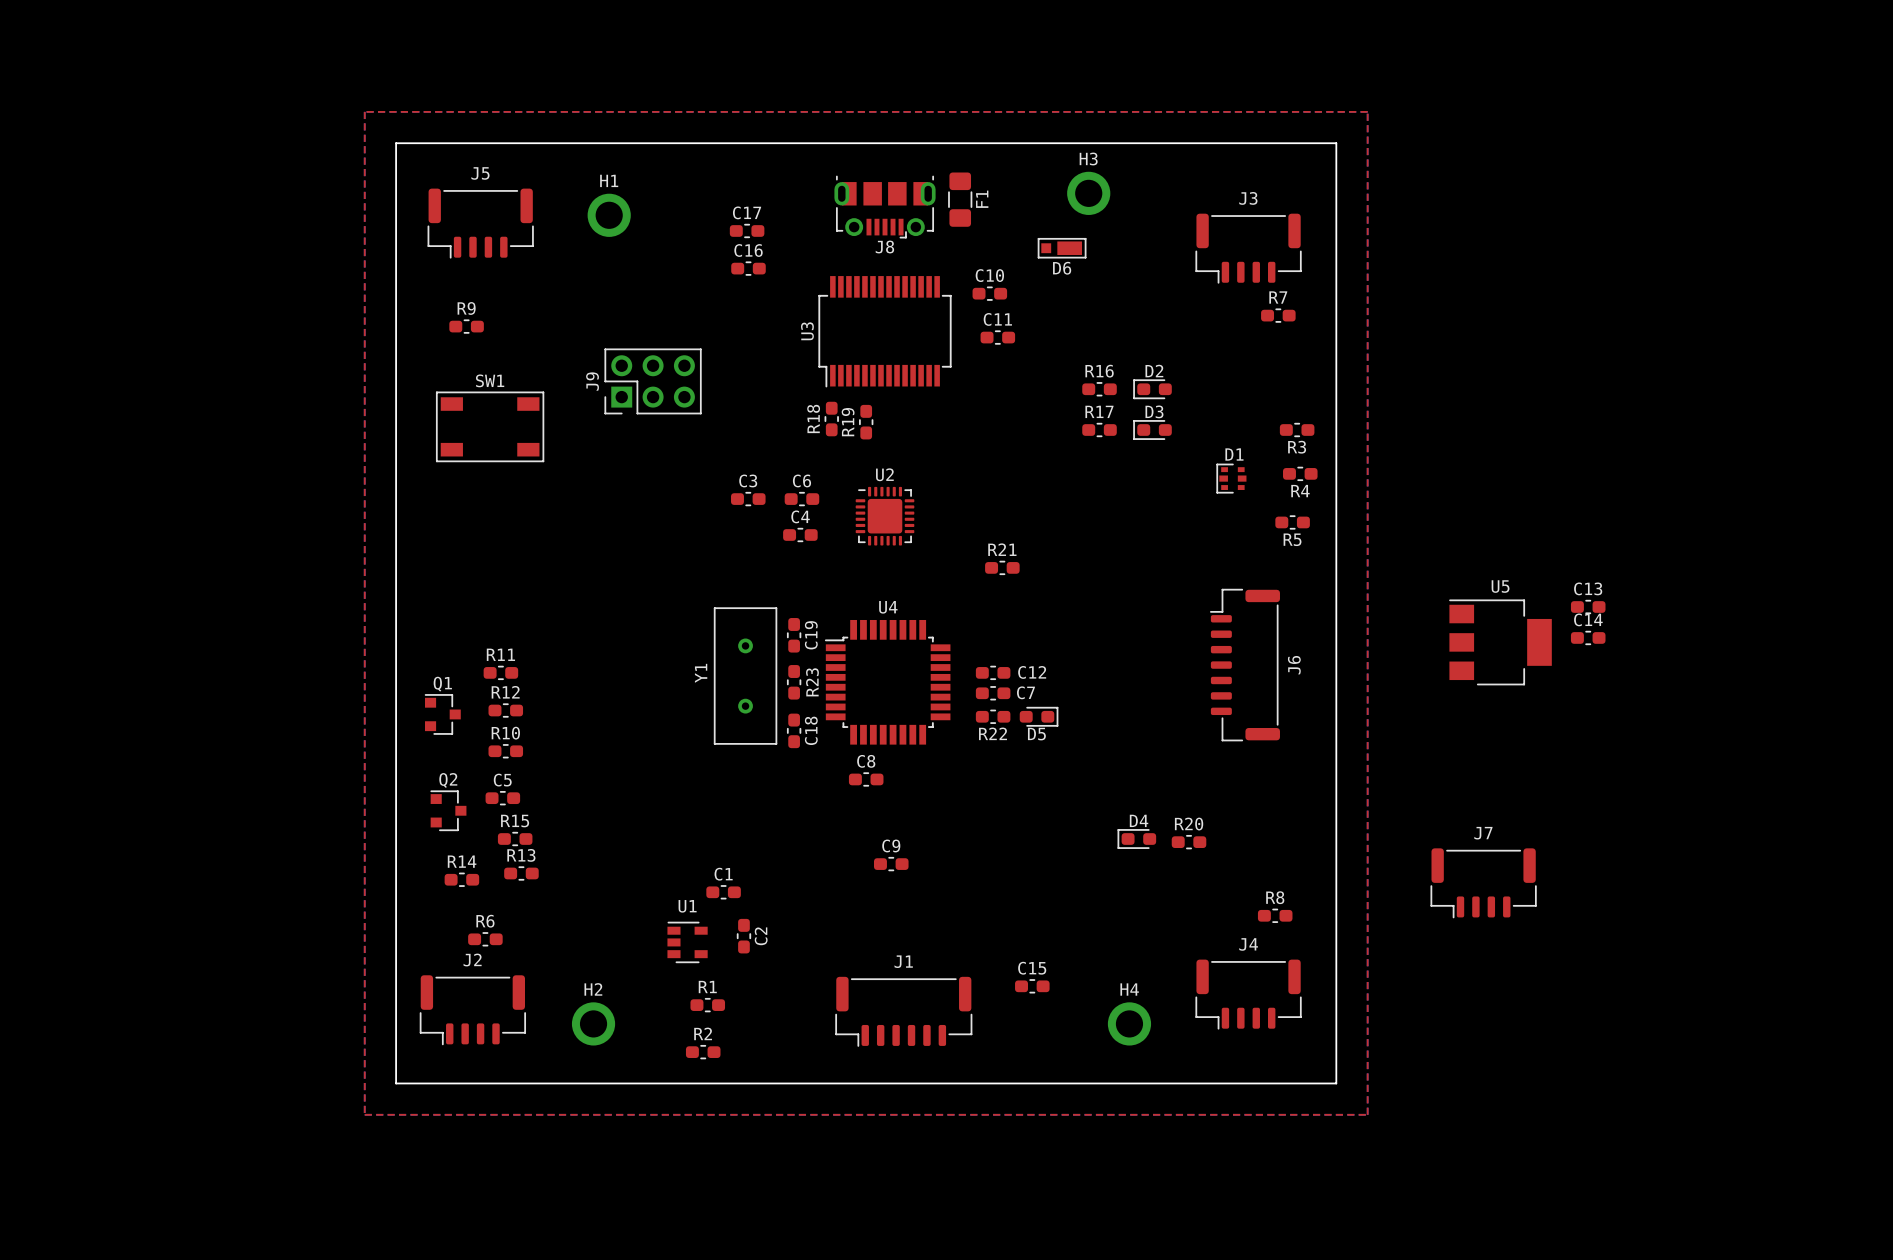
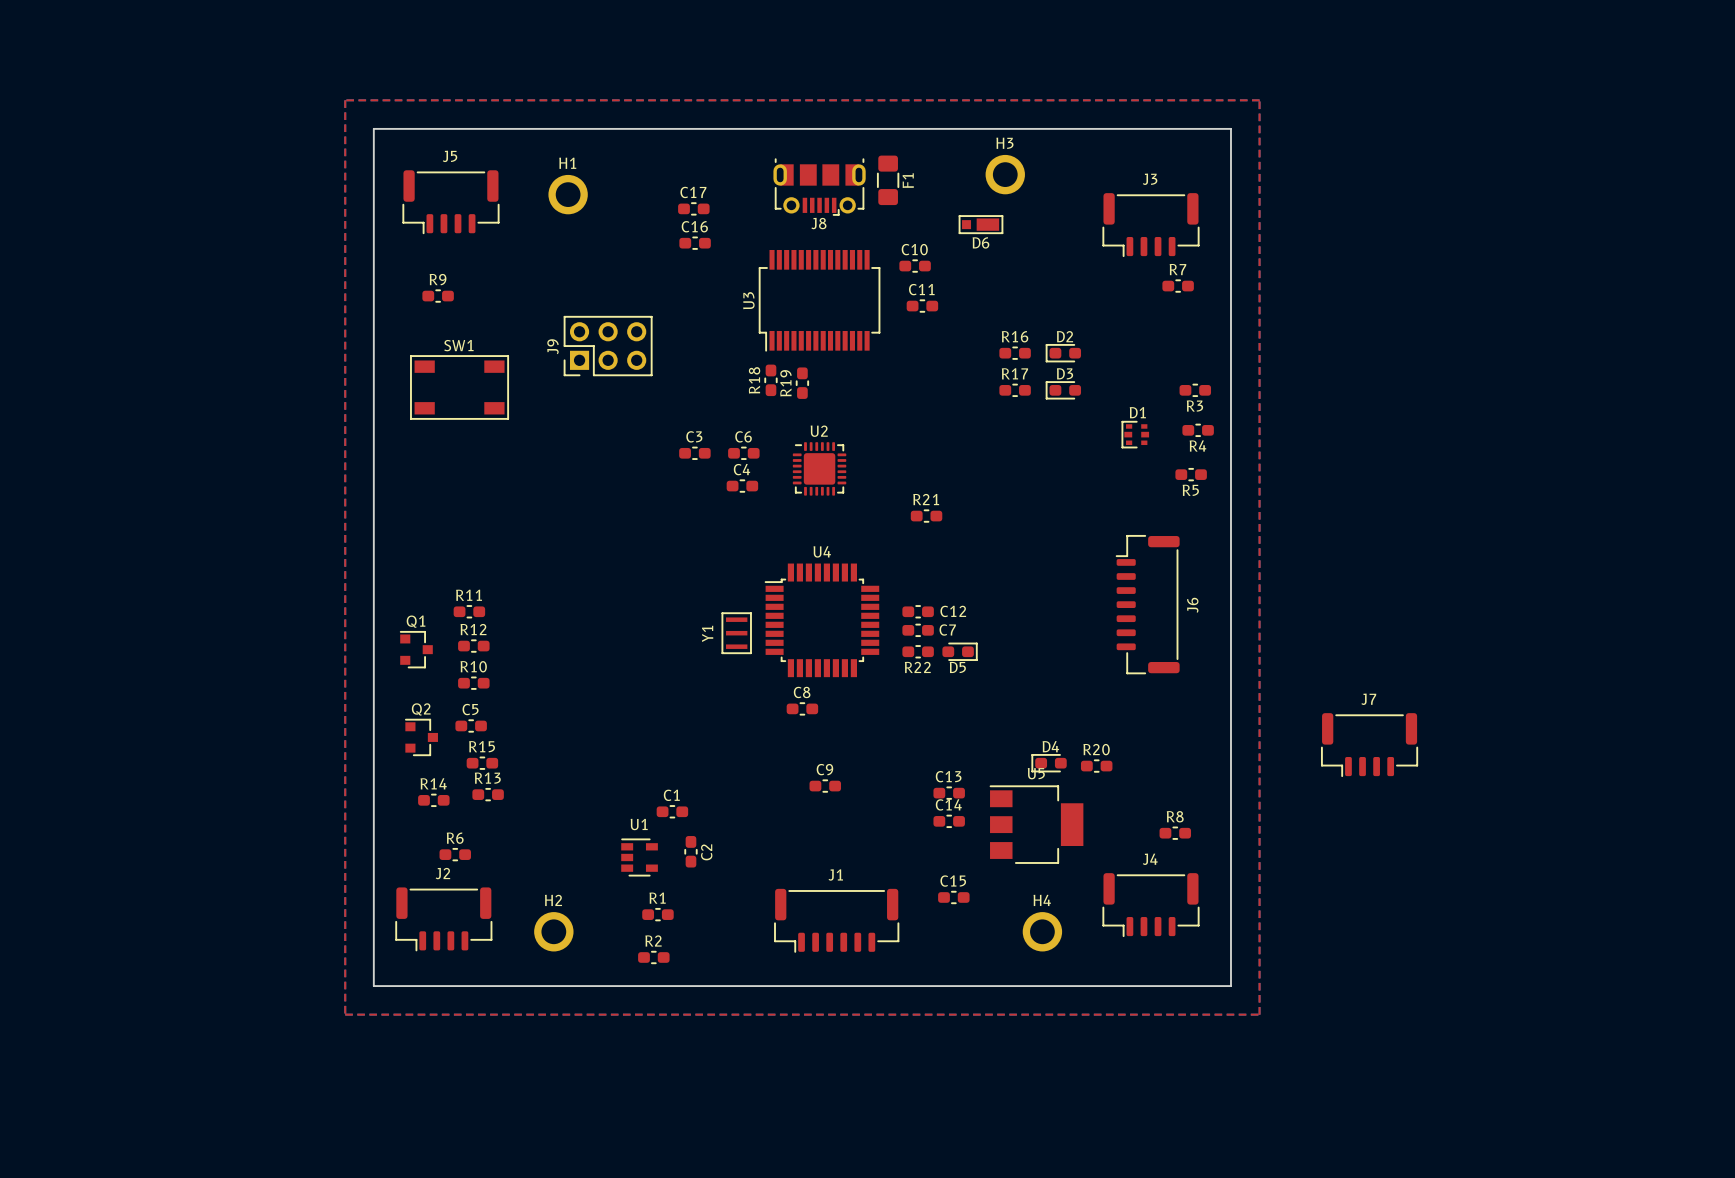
C13 position: (1588, 606) -> (949, 793)
Y1 footprint: [713, 607, 778, 745] -> [721, 612, 752, 654]
C19: (794, 635) -> none
C14 position: (1588, 637) -> (949, 821)
U5 position: (1500, 642) -> (1036, 824)
R23: (794, 682) -> none
C18: (794, 730) -> none
J7 position: (1483, 883) -> (1369, 744)

